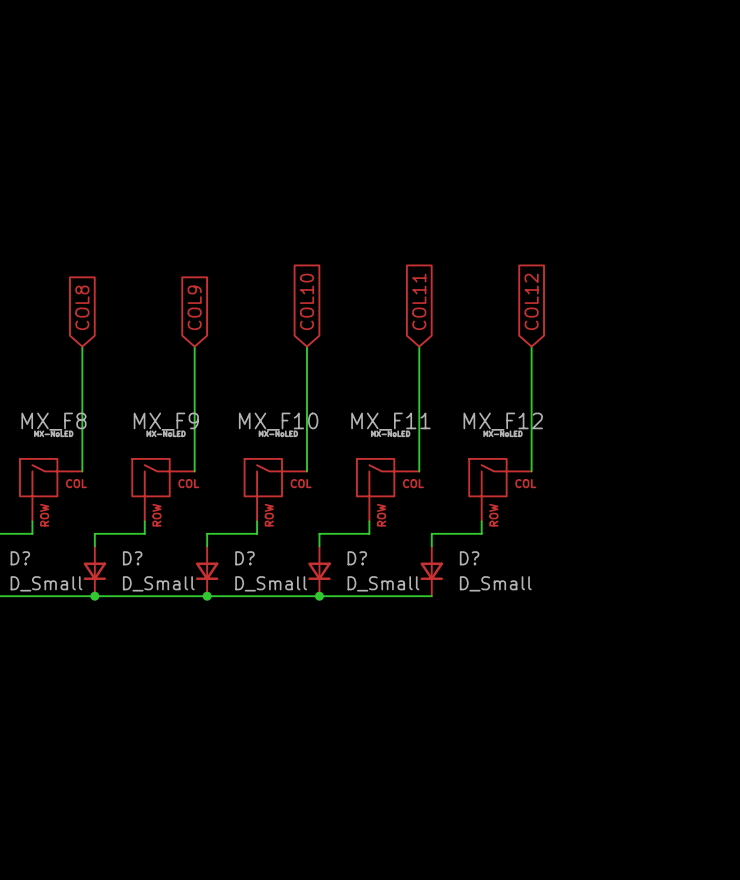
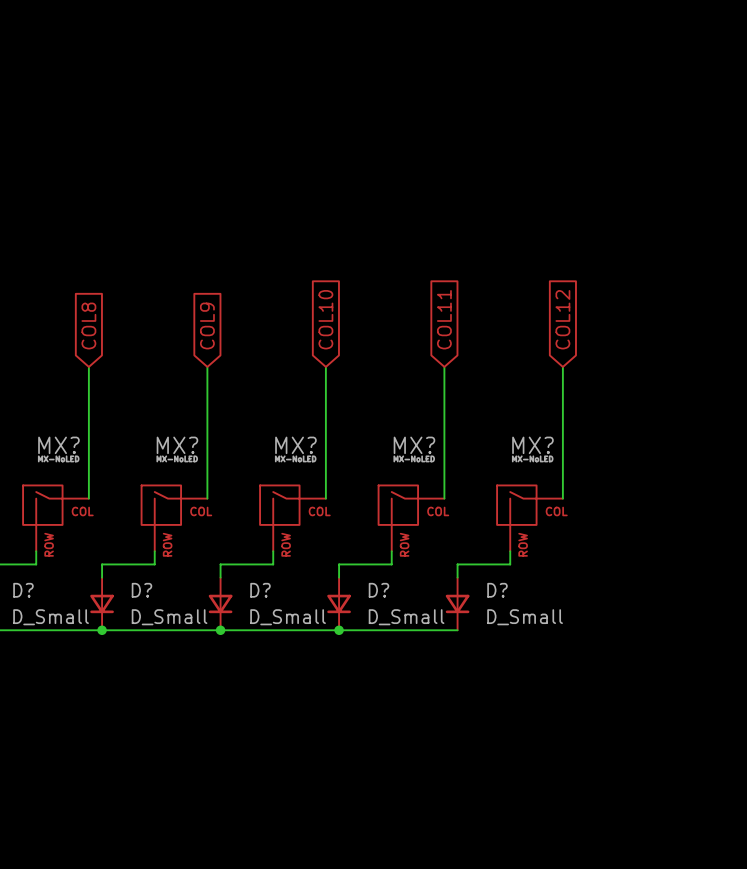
MX_F8 name: MX_F8 (53, 421) -> MX? (58, 445)
MX_F9 name: MX_F9 (166, 421) -> MX? (177, 445)
MX_F10 name: MX_F10 (278, 421) -> MX? (295, 445)
MX_F11 name: MX_F11 (390, 421) -> MX? (414, 445)
MX_F12 name: MX_F12 (503, 421) -> MX? (532, 445)

